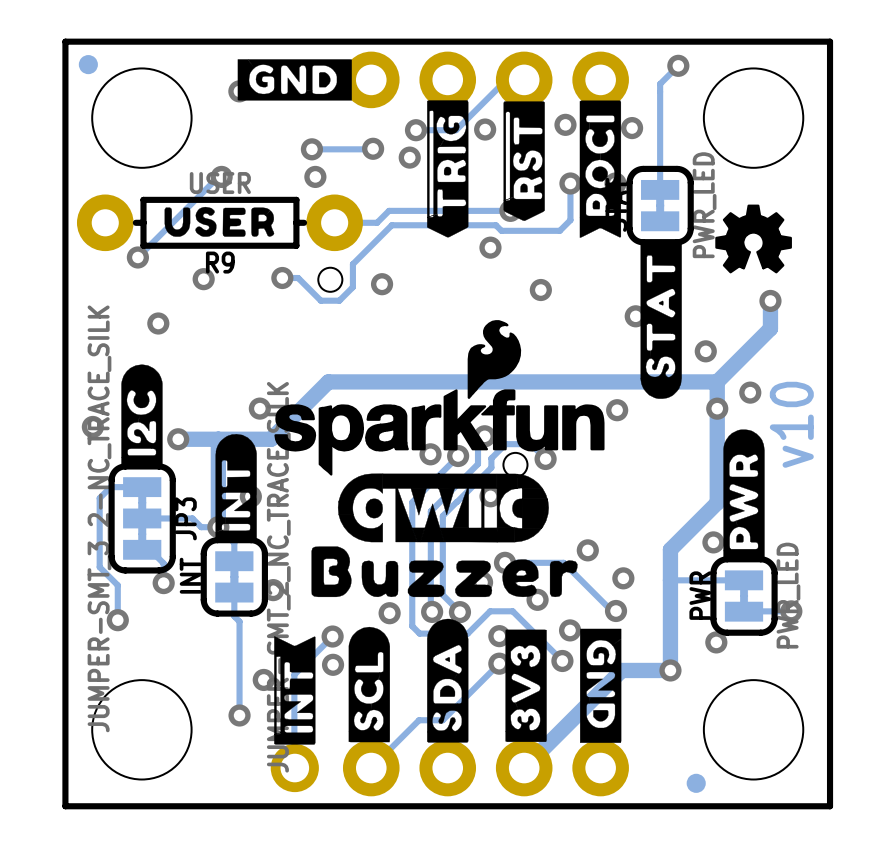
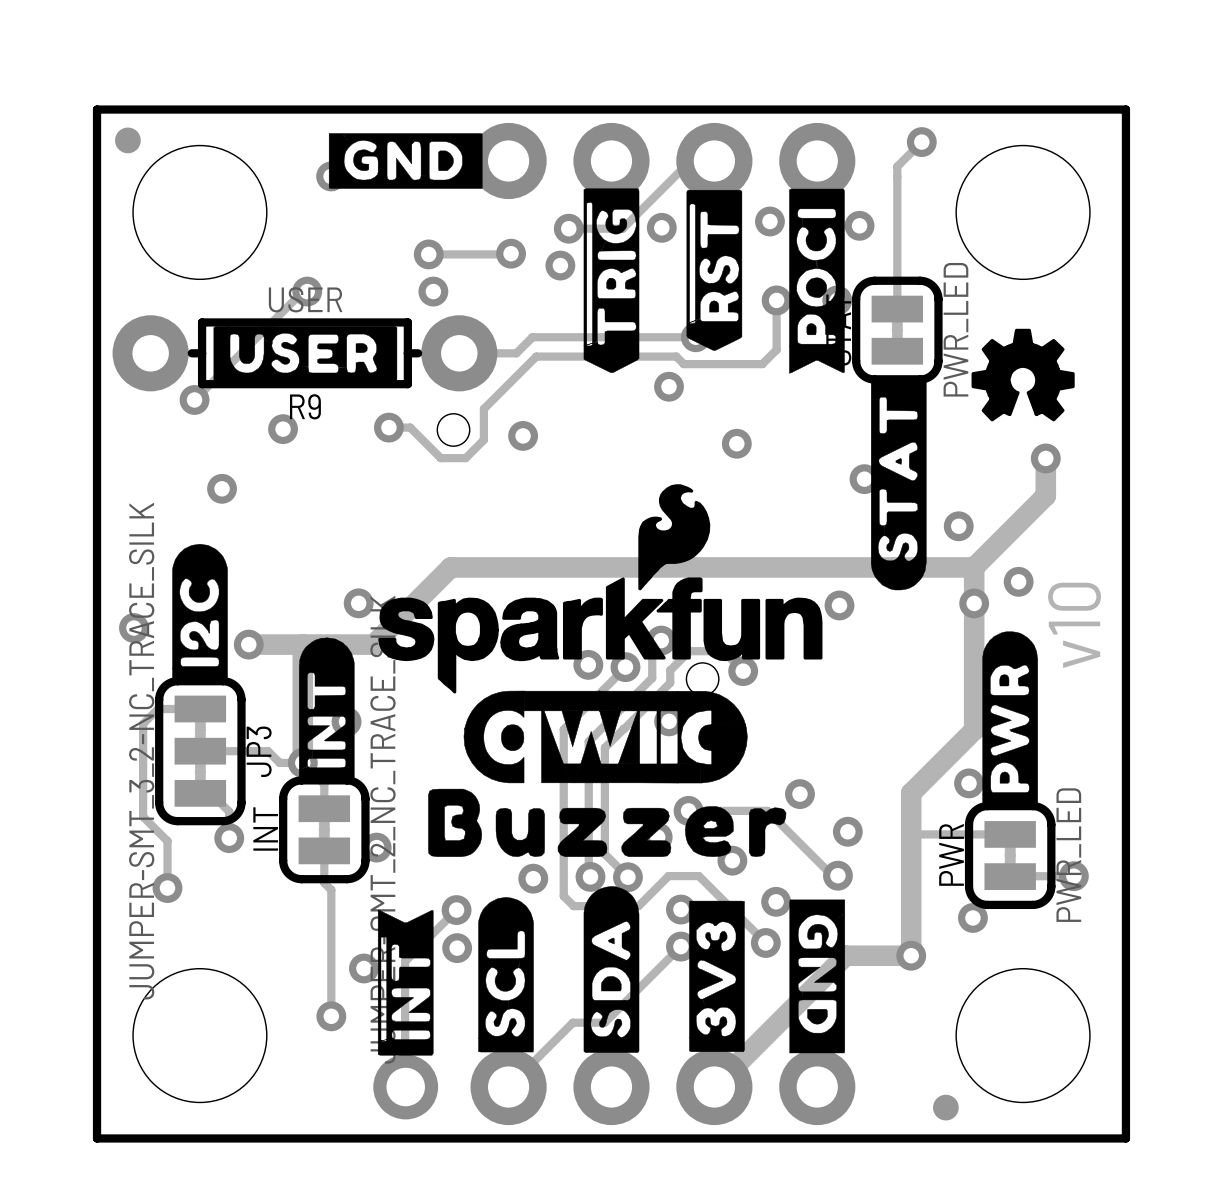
drawing shape: [164, 206, 275, 237] -> [213, 326, 398, 382]

